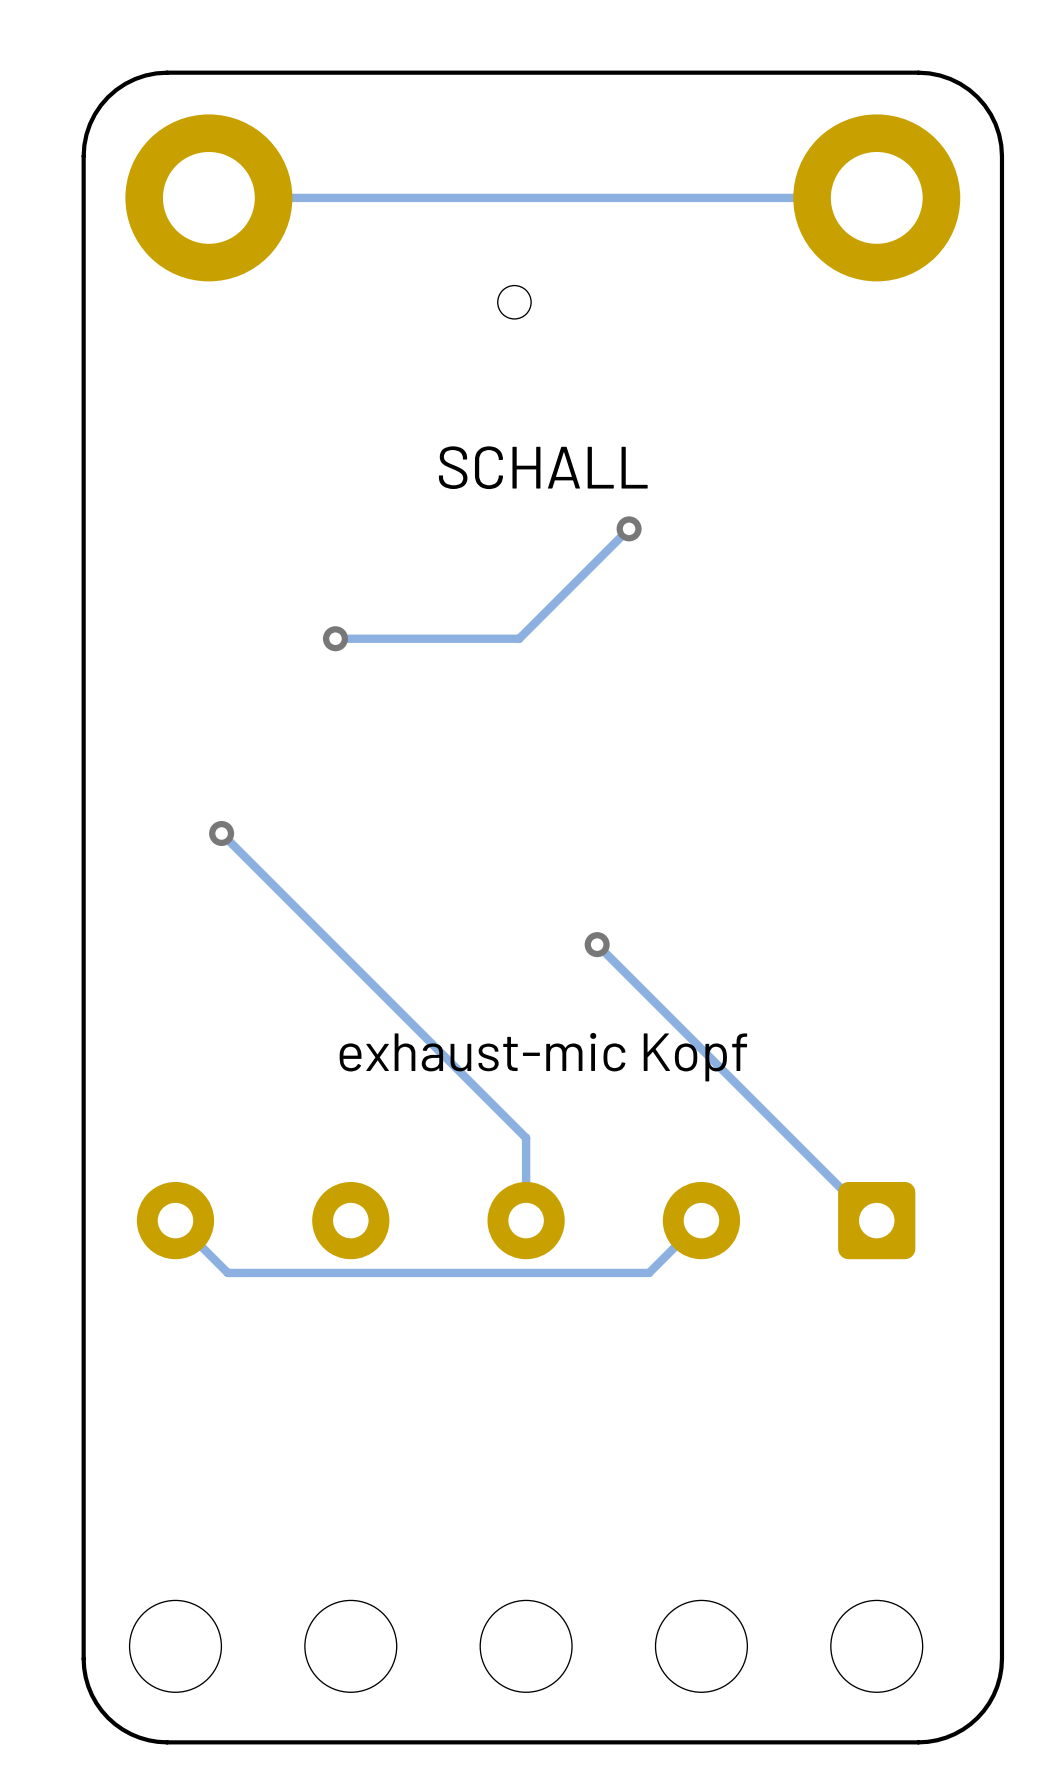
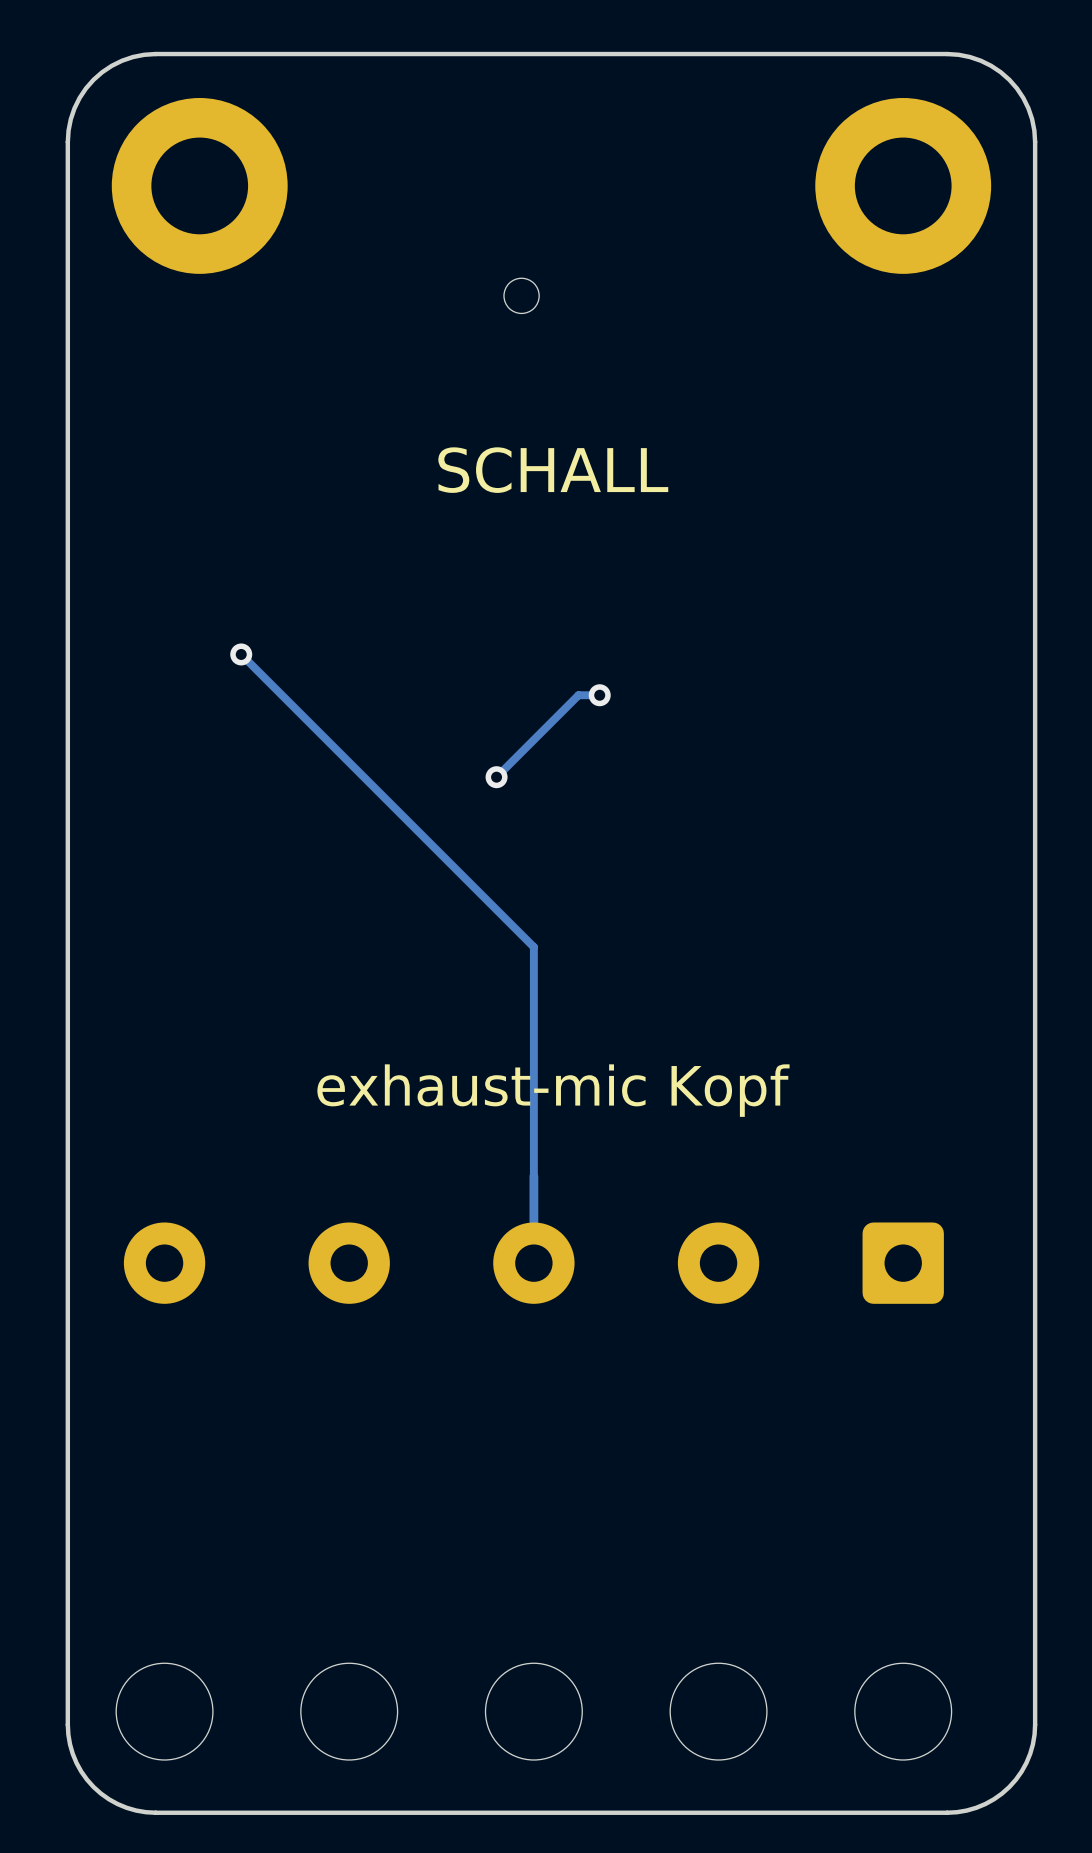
track: (876, 197) (208, 197) -> none
track: (629, 528) (519, 638) (335, 638) -> none
via: (629, 528) -> none
via: (335, 638) -> none
via: none -> (241, 654)
track: none -> (599, 695) (578, 695) (496, 777)
via: none -> (599, 695)
via: none -> (496, 777)
track: (221, 833) (526, 1137) -> (241, 654) (533, 947) (533, 1176)
via: (221, 833) -> none
track: (597, 944) (873, 1220) (876, 1220) -> none
via: (597, 944) -> none
track: (701, 1220) (649, 1272) (227, 1272) (175, 1220) -> none

